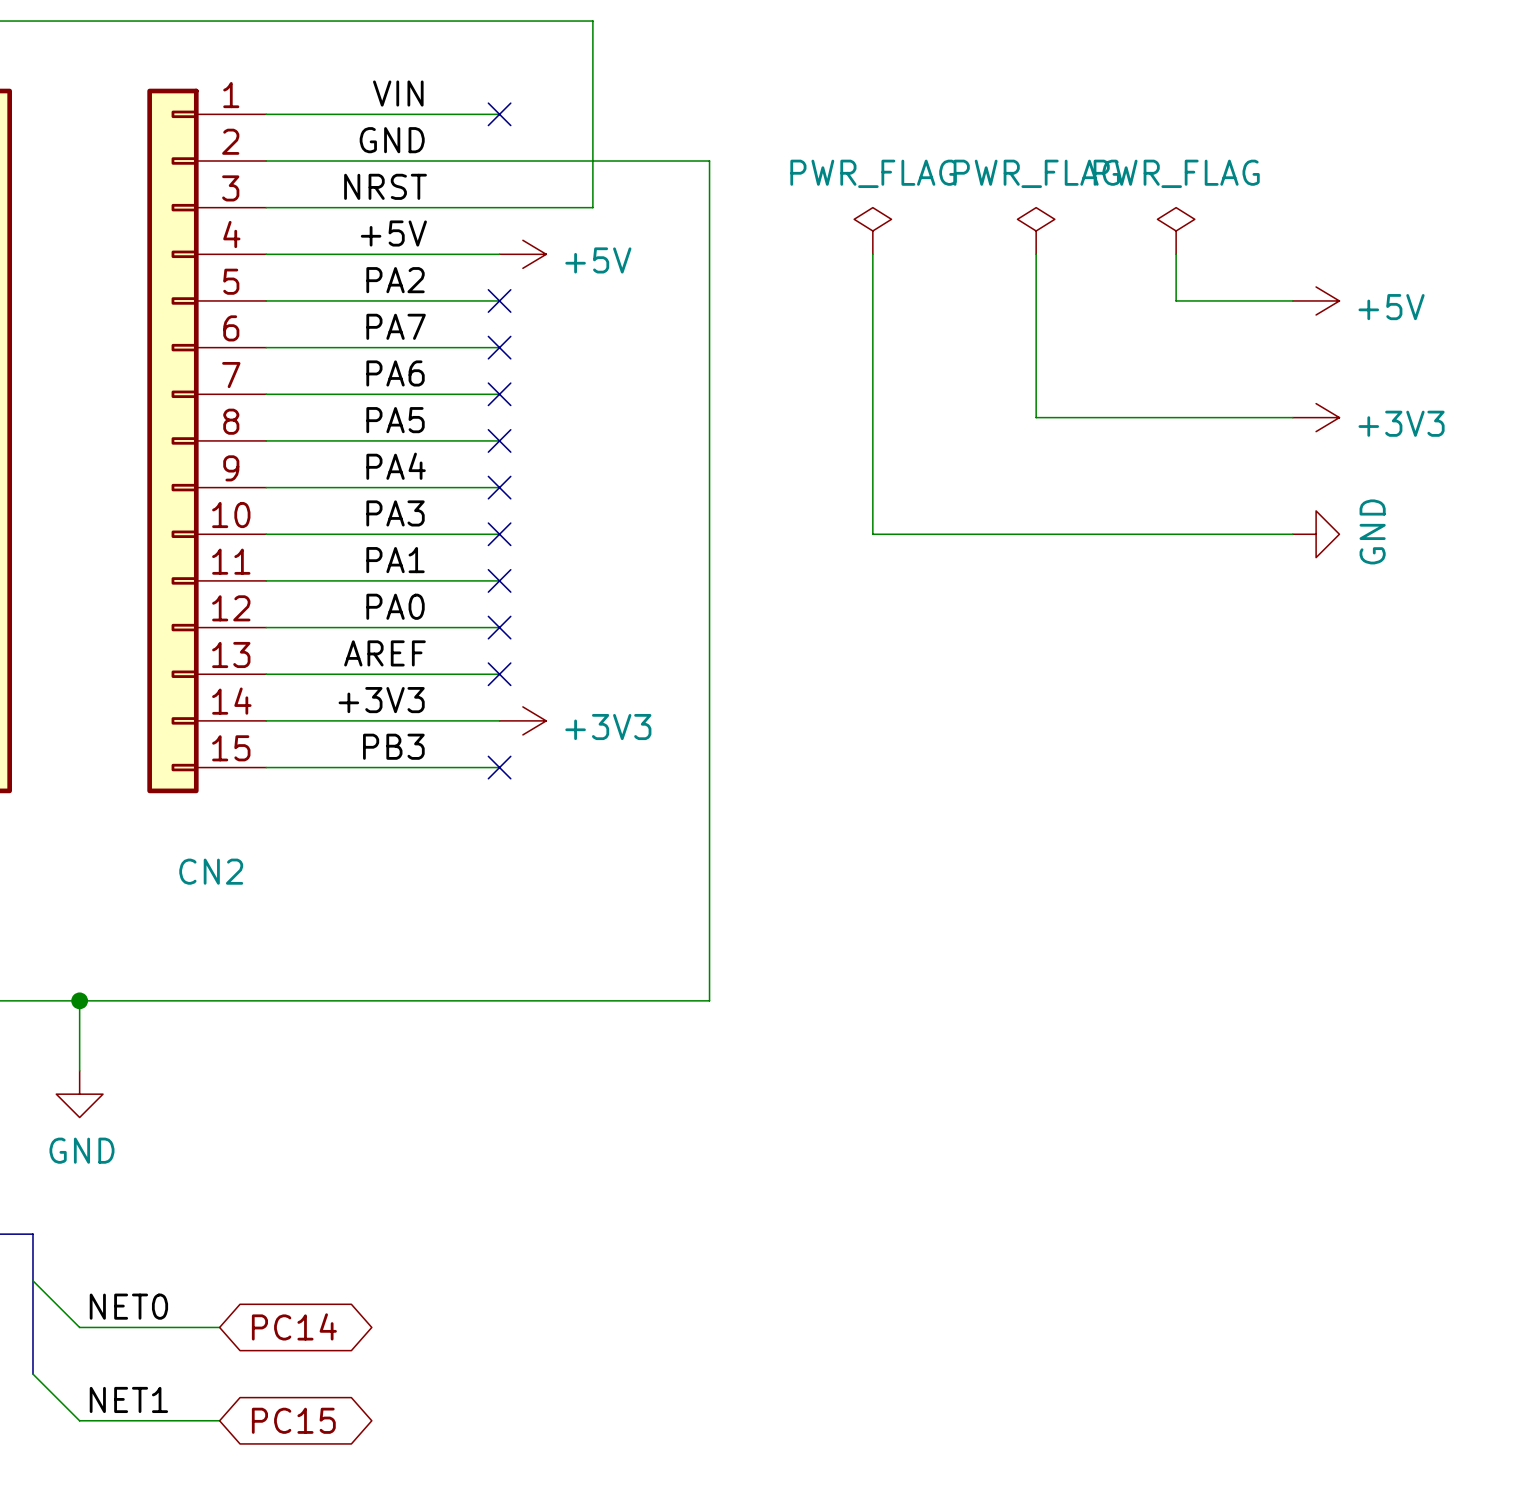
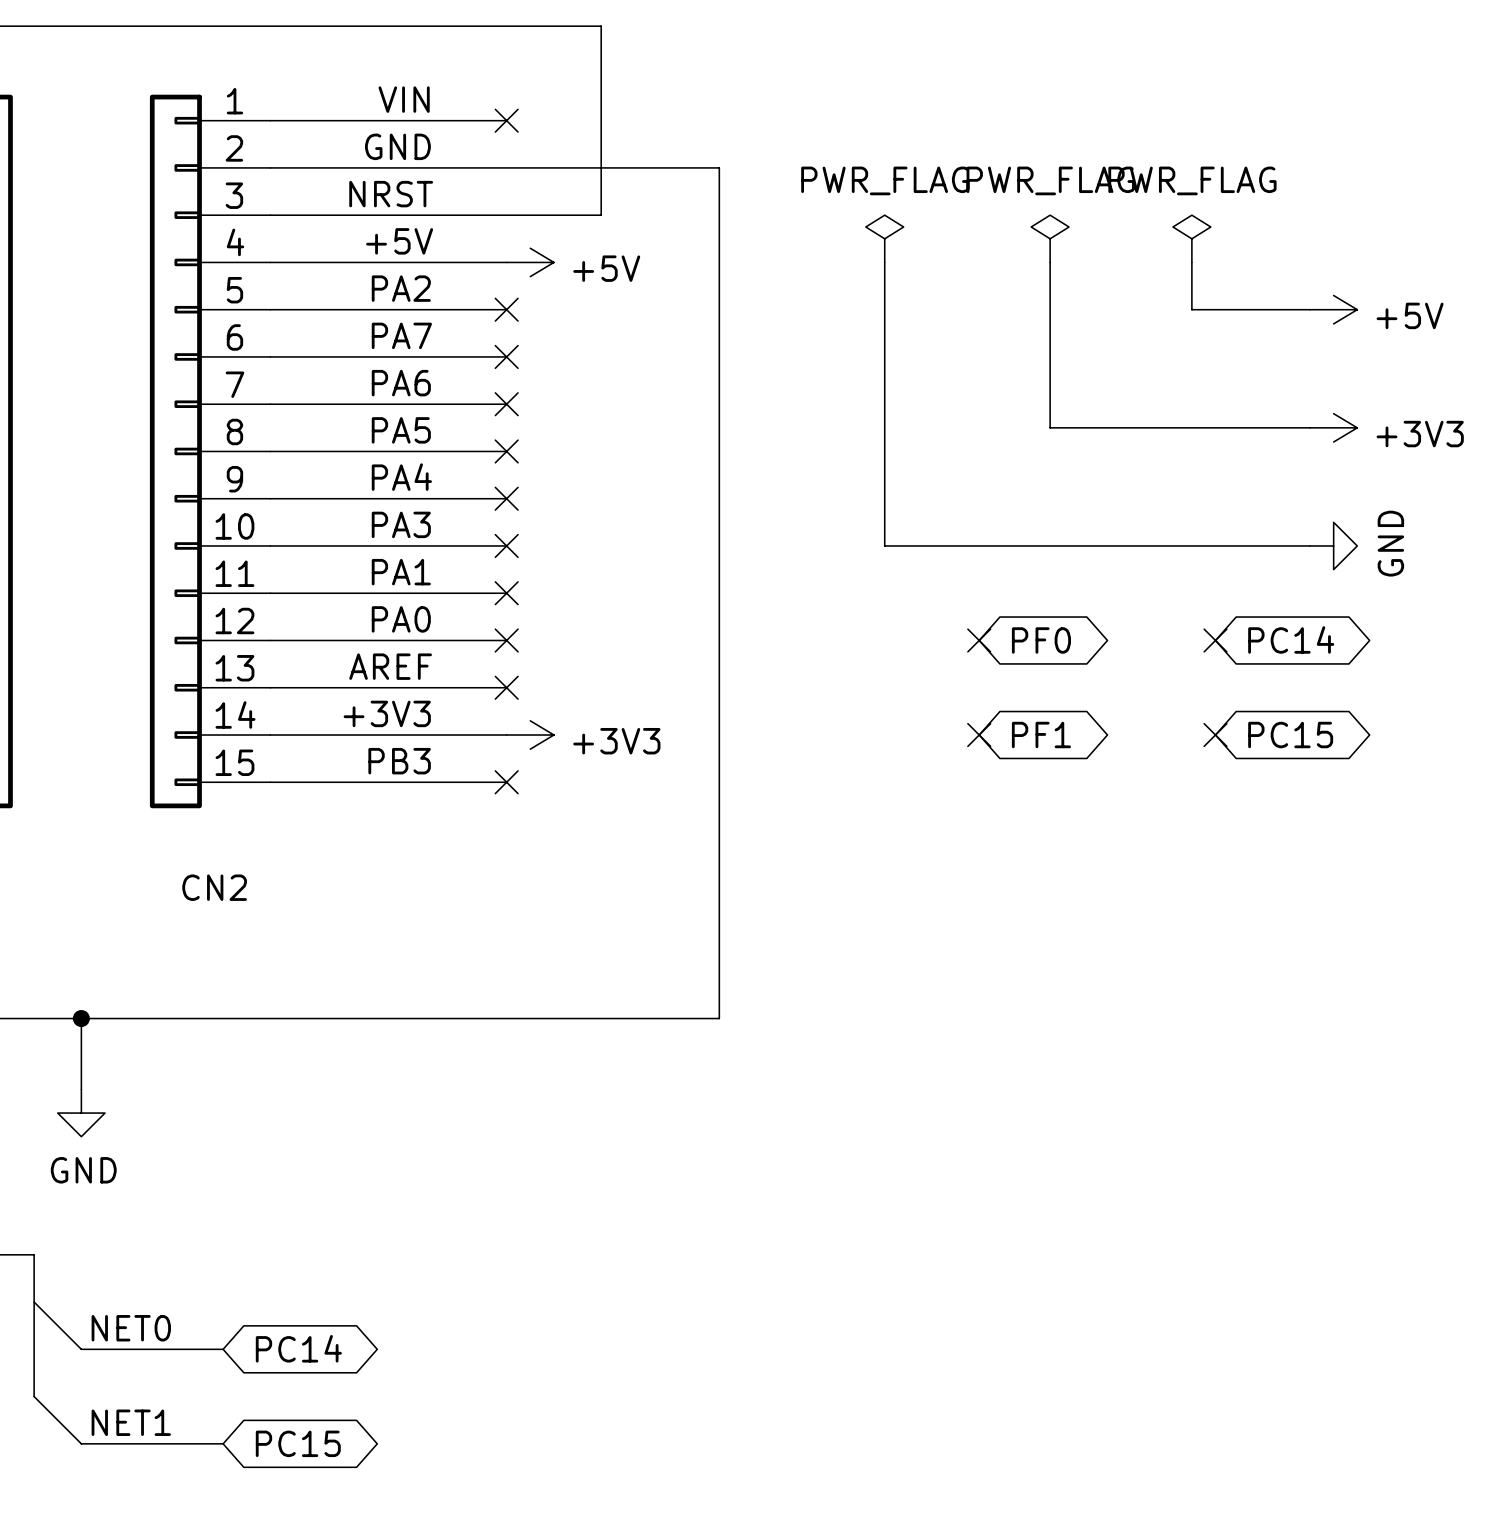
no-connect mark: none -> (979, 640)
global label: none -> PF0 (1041, 640)
no-connect mark: none -> (1215, 640)
global label: none -> PC14 (1291, 639)
no-connect mark: none -> (979, 735)
global label: none -> PF1 (1041, 735)
no-connect mark: none -> (1215, 735)
global label: none -> PC15 (1290, 735)

